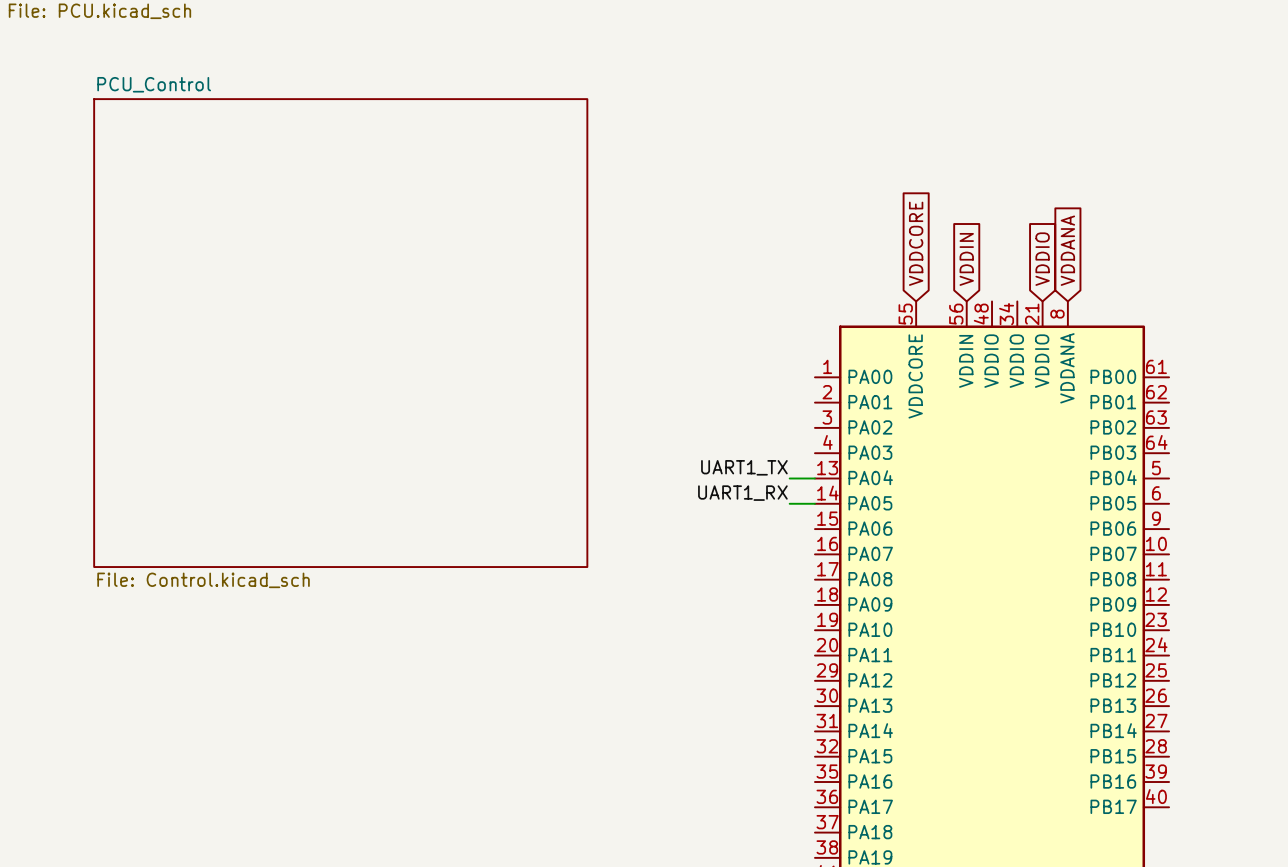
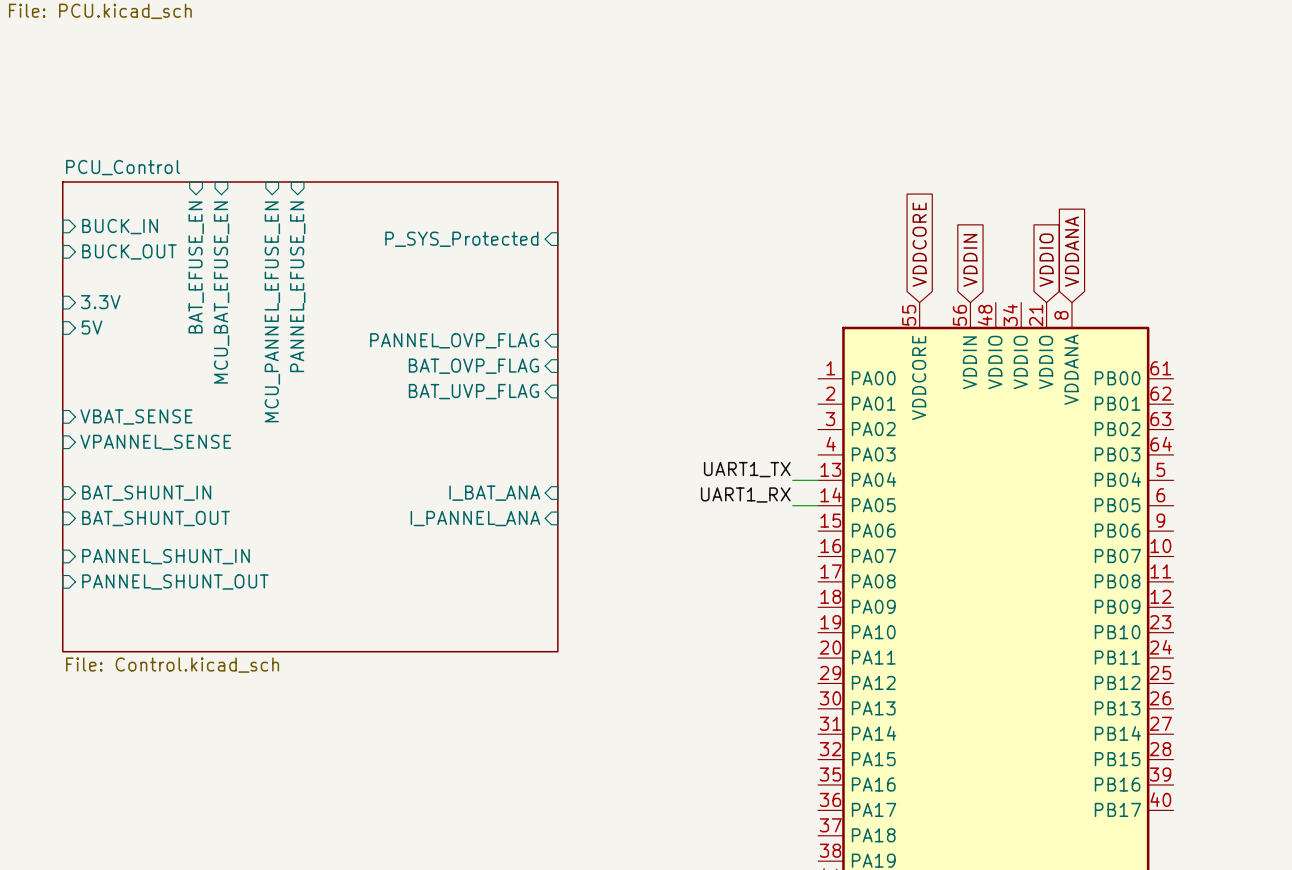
sheet pin: none -> BUCK_IN (120, 226)
sheet pin: none -> P_SYS_Protected (461, 239)
sheet pin: none -> BUCK_OUT (129, 251)
sheet pin: none -> BAT_EFUSE_EN (196, 267)
sheet pin: none -> PANNEL_EFUSE_EN (297, 286)
sheet pin: none -> MCU_BAT_EFUSE_EN (221, 292)
sheet pin: none -> 3.3V (100, 302)
sheet pin: none -> MCU_PANNEL_EFUSE_EN (272, 311)
sheet pin: none -> 5V (91, 327)
sheet PCU_Control position: (340, 333) -> (310, 416)
sheet pin: none -> PANNEL_OVP_FLAG (454, 340)
sheet pin: none -> BAT_OVP_FLAG (473, 366)
sheet pin: none -> BAT_UVP_FLAG (473, 391)
sheet pin: none -> VBAT_SENSE (136, 416)
sheet pin: none -> VPANNEL_SENSE (155, 442)
sheet pin: none -> BAT_SHUNT_IN (146, 493)
sheet pin: none -> I_BAT_ANA (494, 493)
sheet pin: none -> BAT_SHUNT_OUT (156, 518)
sheet pin: none -> I_PANNEL_ANA (475, 518)
sheet pin: none -> PANNEL_SHUNT_IN (166, 556)
sheet pin: none -> PANNEL_SHUNT_OUT (175, 582)

